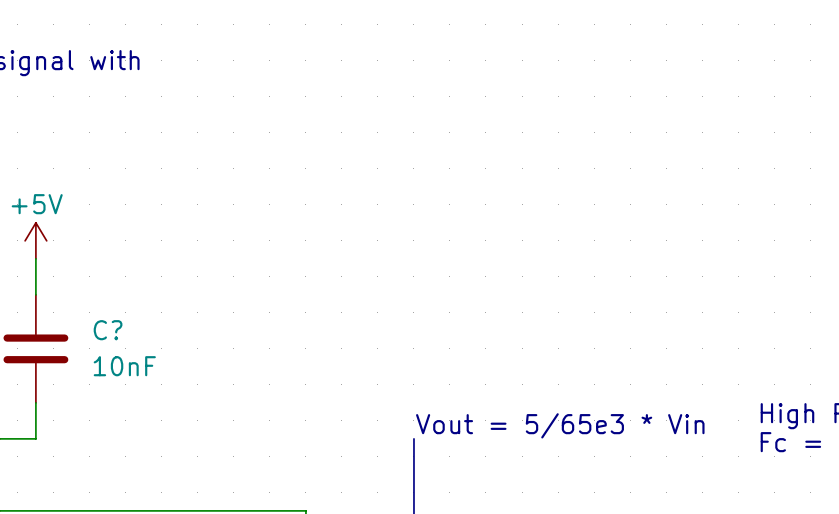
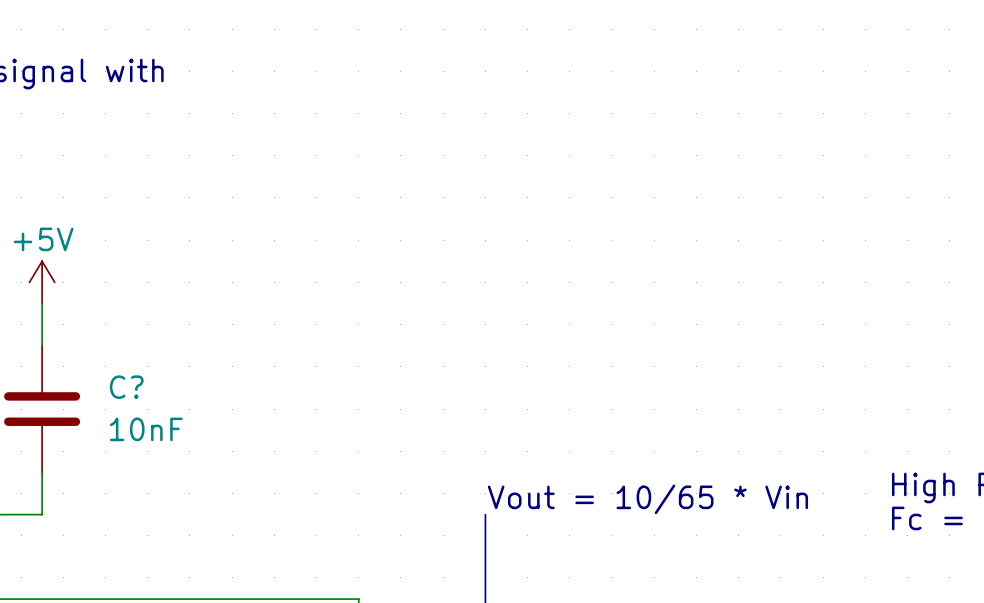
text: Vout = 5/65e3 * Vin (560, 425) -> Vout = 10/65 * Vin (647, 499)

